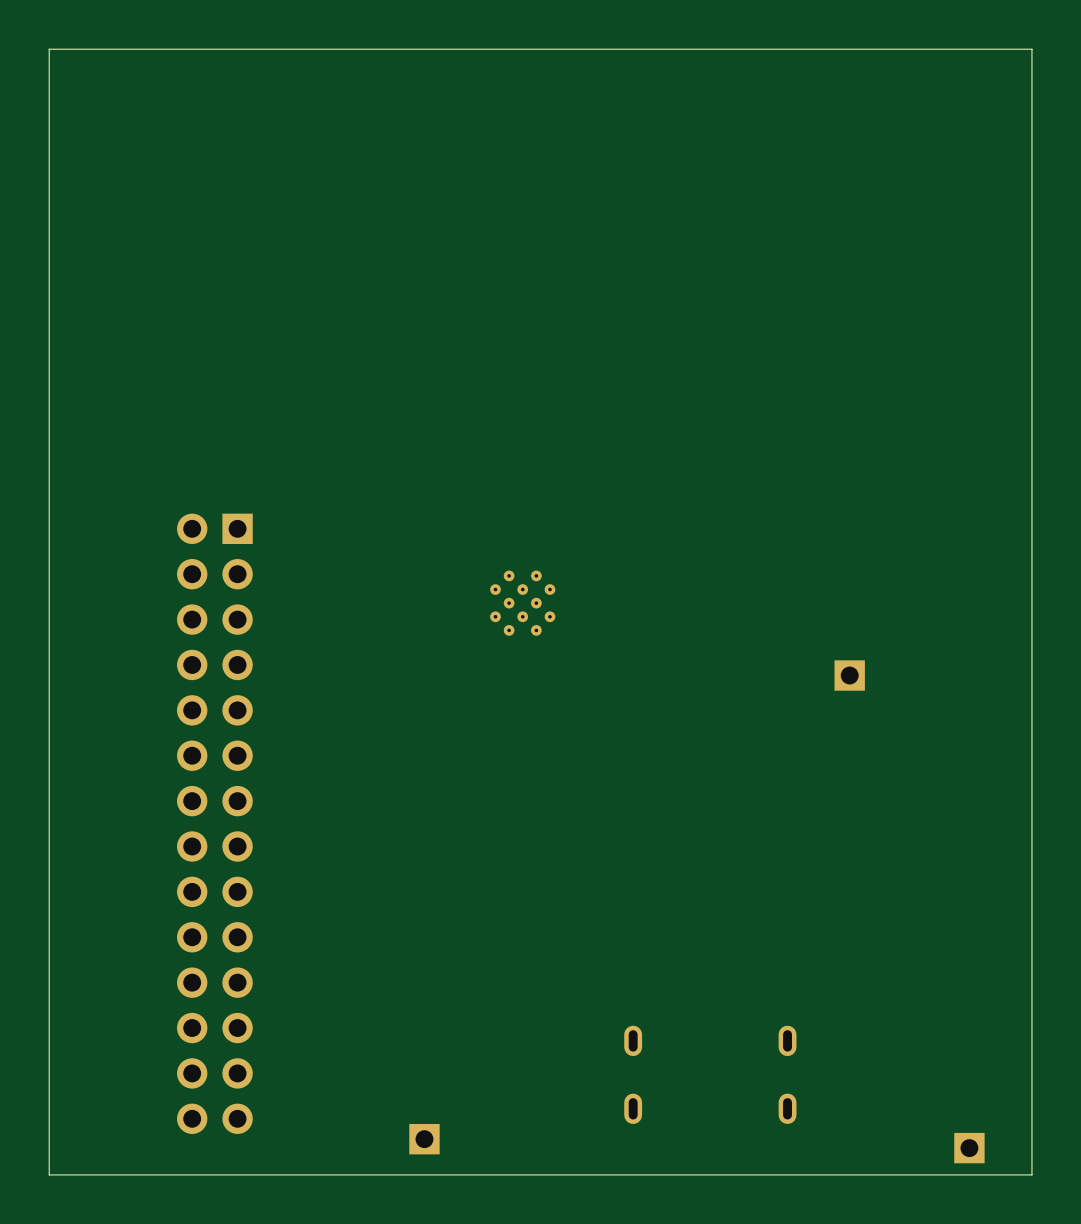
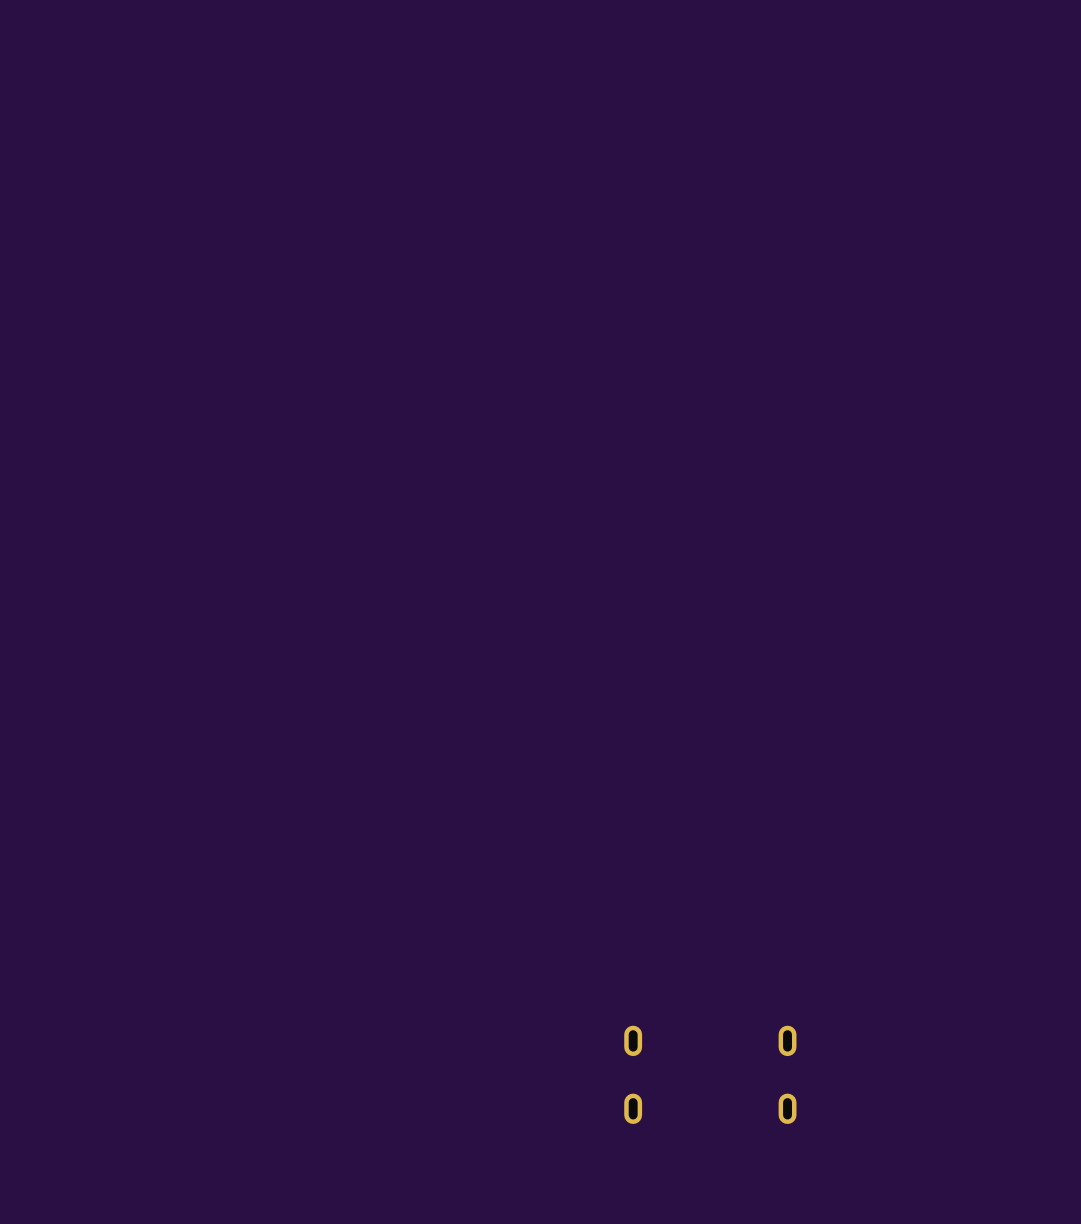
board edge: (1031, 49) (49, 49) (49, 1174) (1031, 1174) (1031, 49) -> none
part: (522, 603) -> none
part: (849, 675) -> none
part: (214, 823) -> none
part: (424, 1139) -> none
part: (969, 1148) -> none

